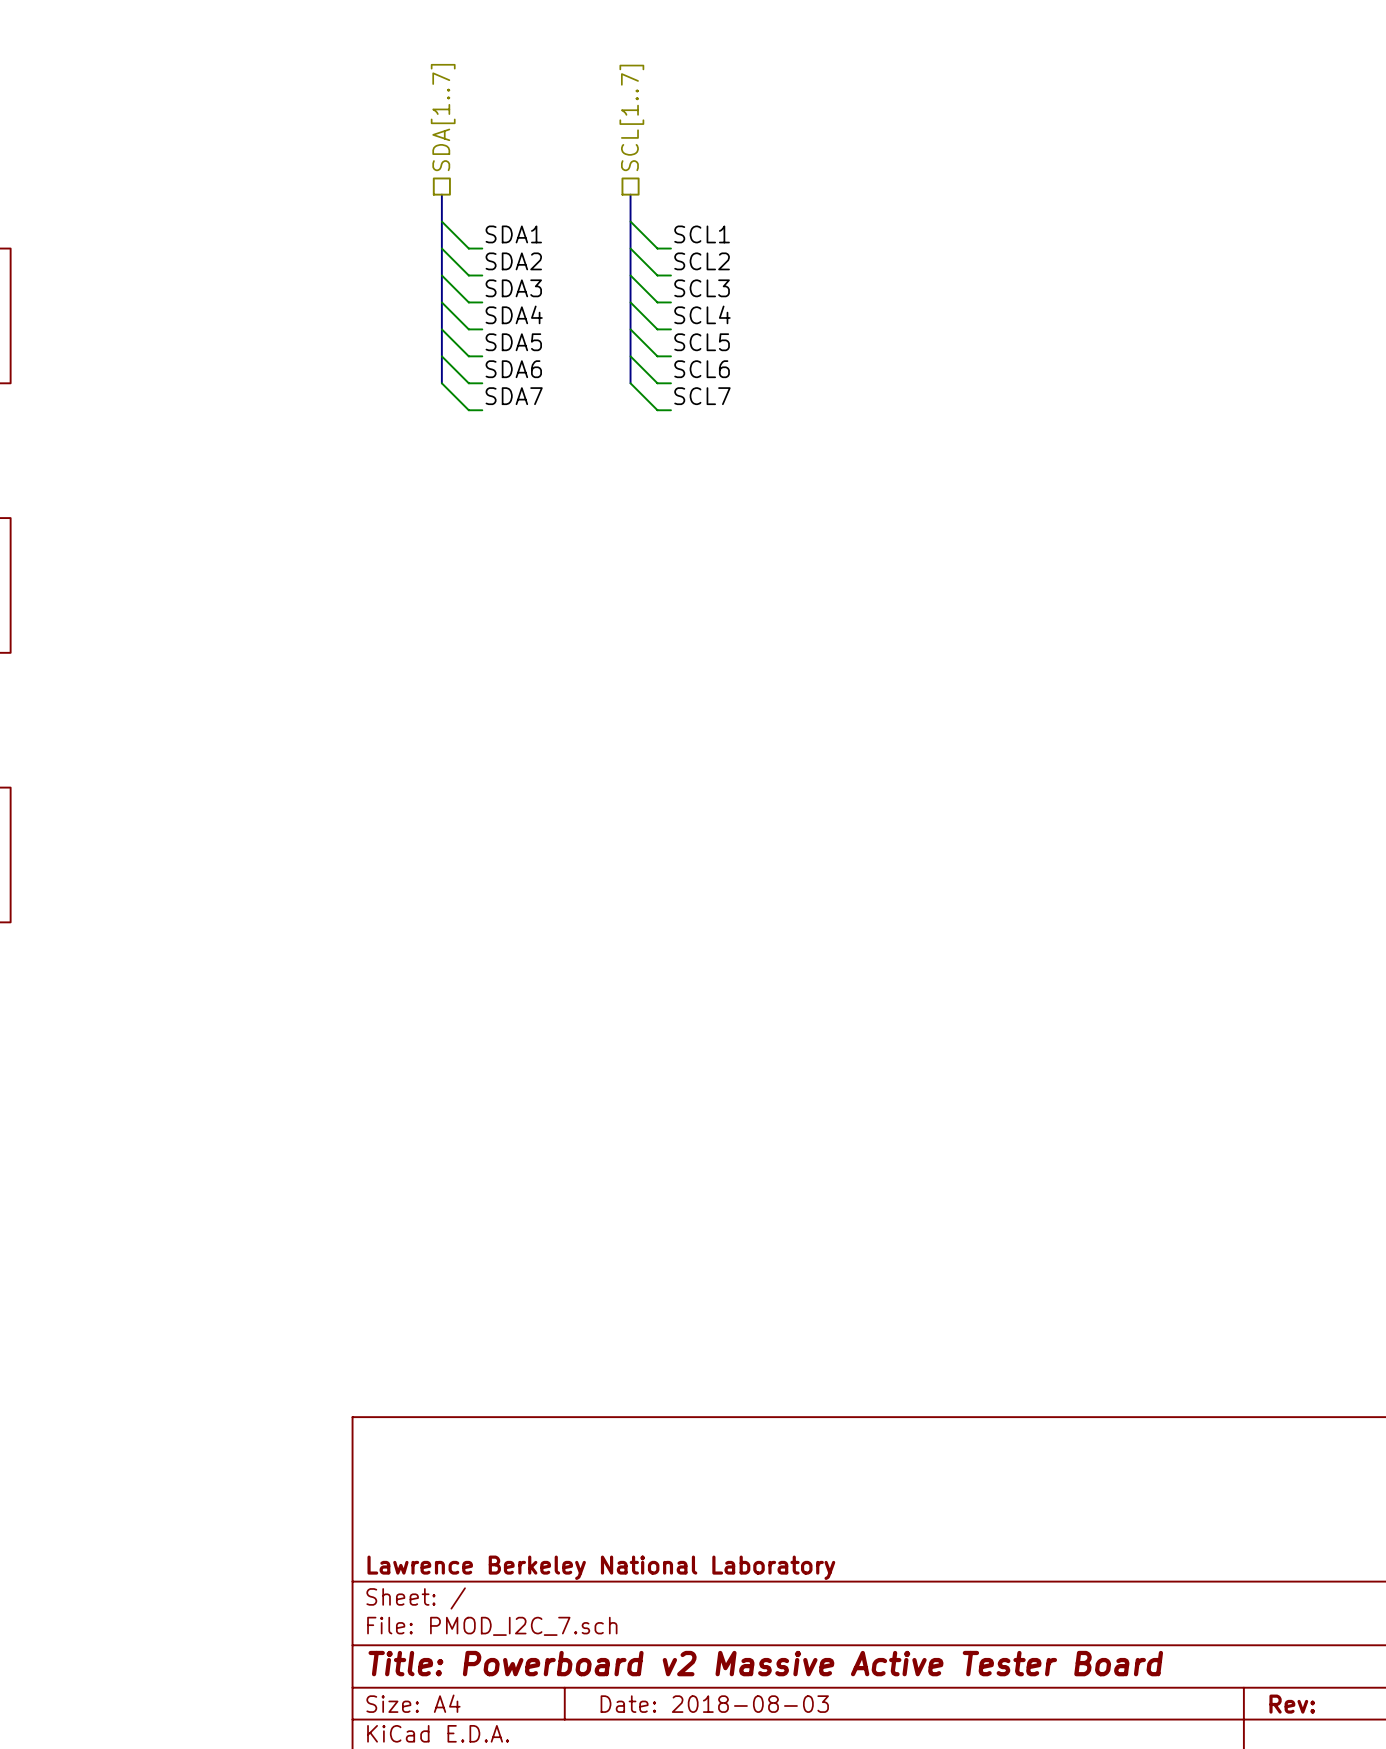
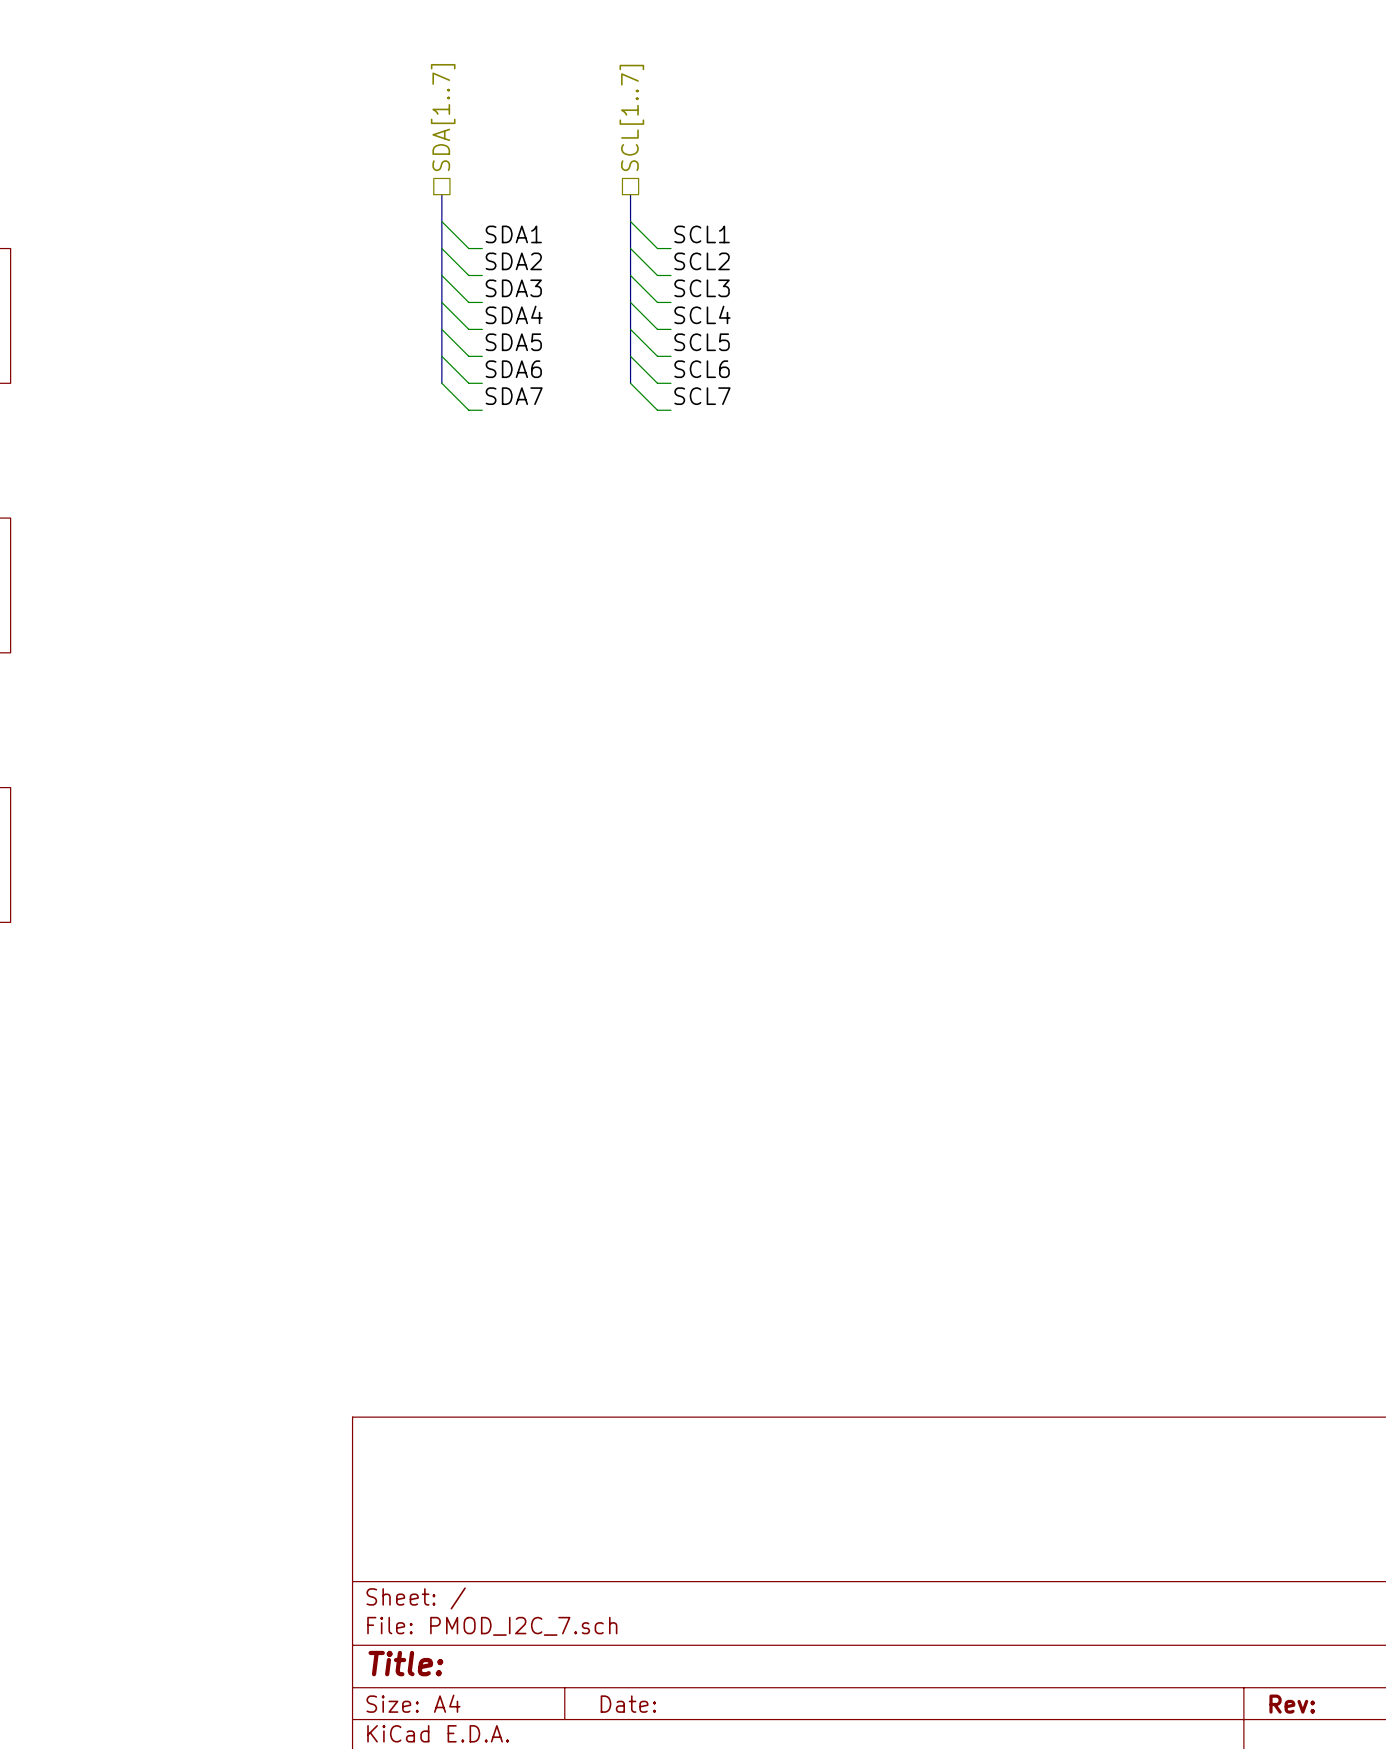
title block: Lawrence Berkeley National Laboratory (601, 1567) -> none
title block: Title: Powerboard v2 Massive Active Tester Board (765, 1663) -> Title: (405, 1663)
title block: Date: 2018-08-03 (714, 1704) -> Date: (628, 1704)

